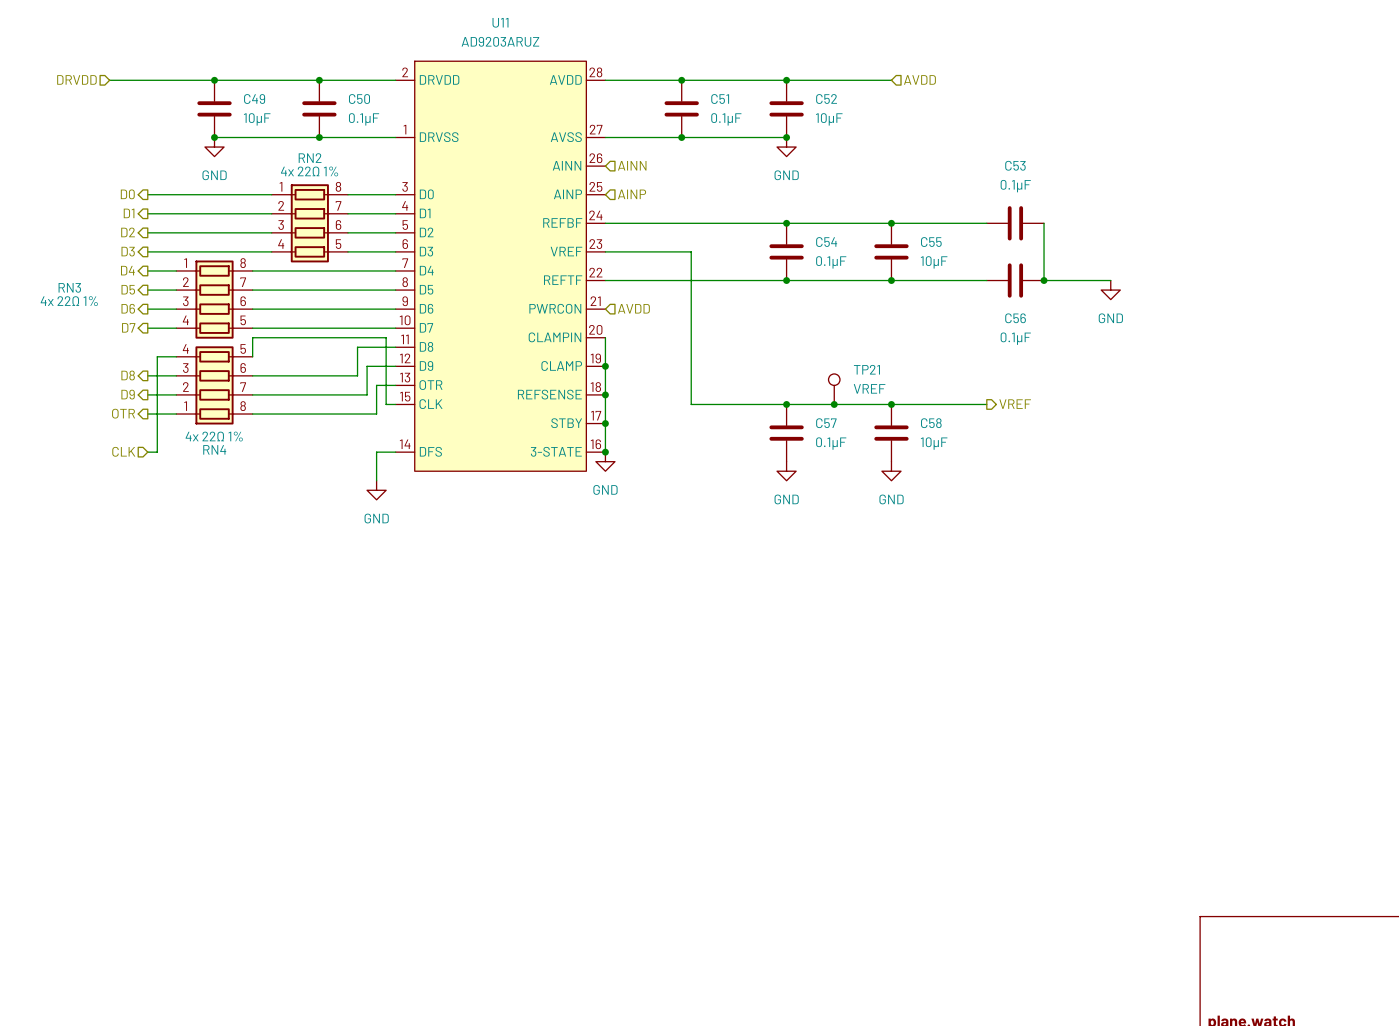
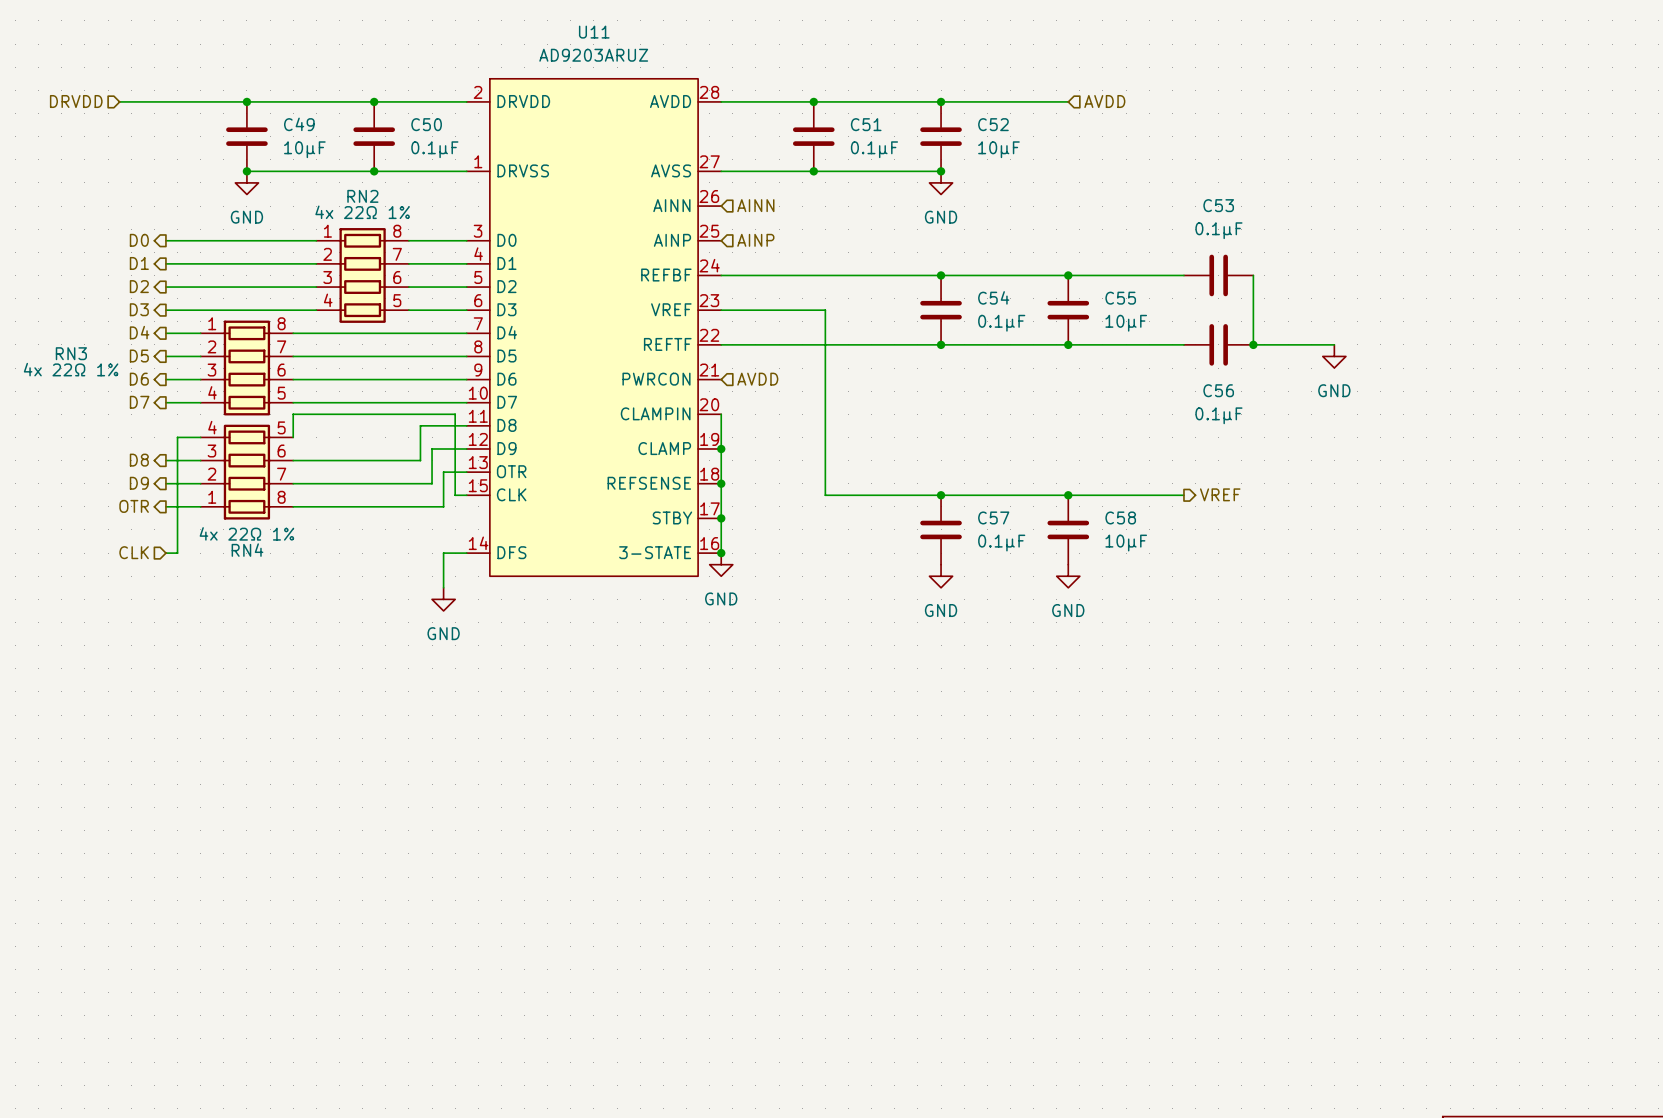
TP21: VREF (834, 389) -> none
junction: (834, 404) -> none

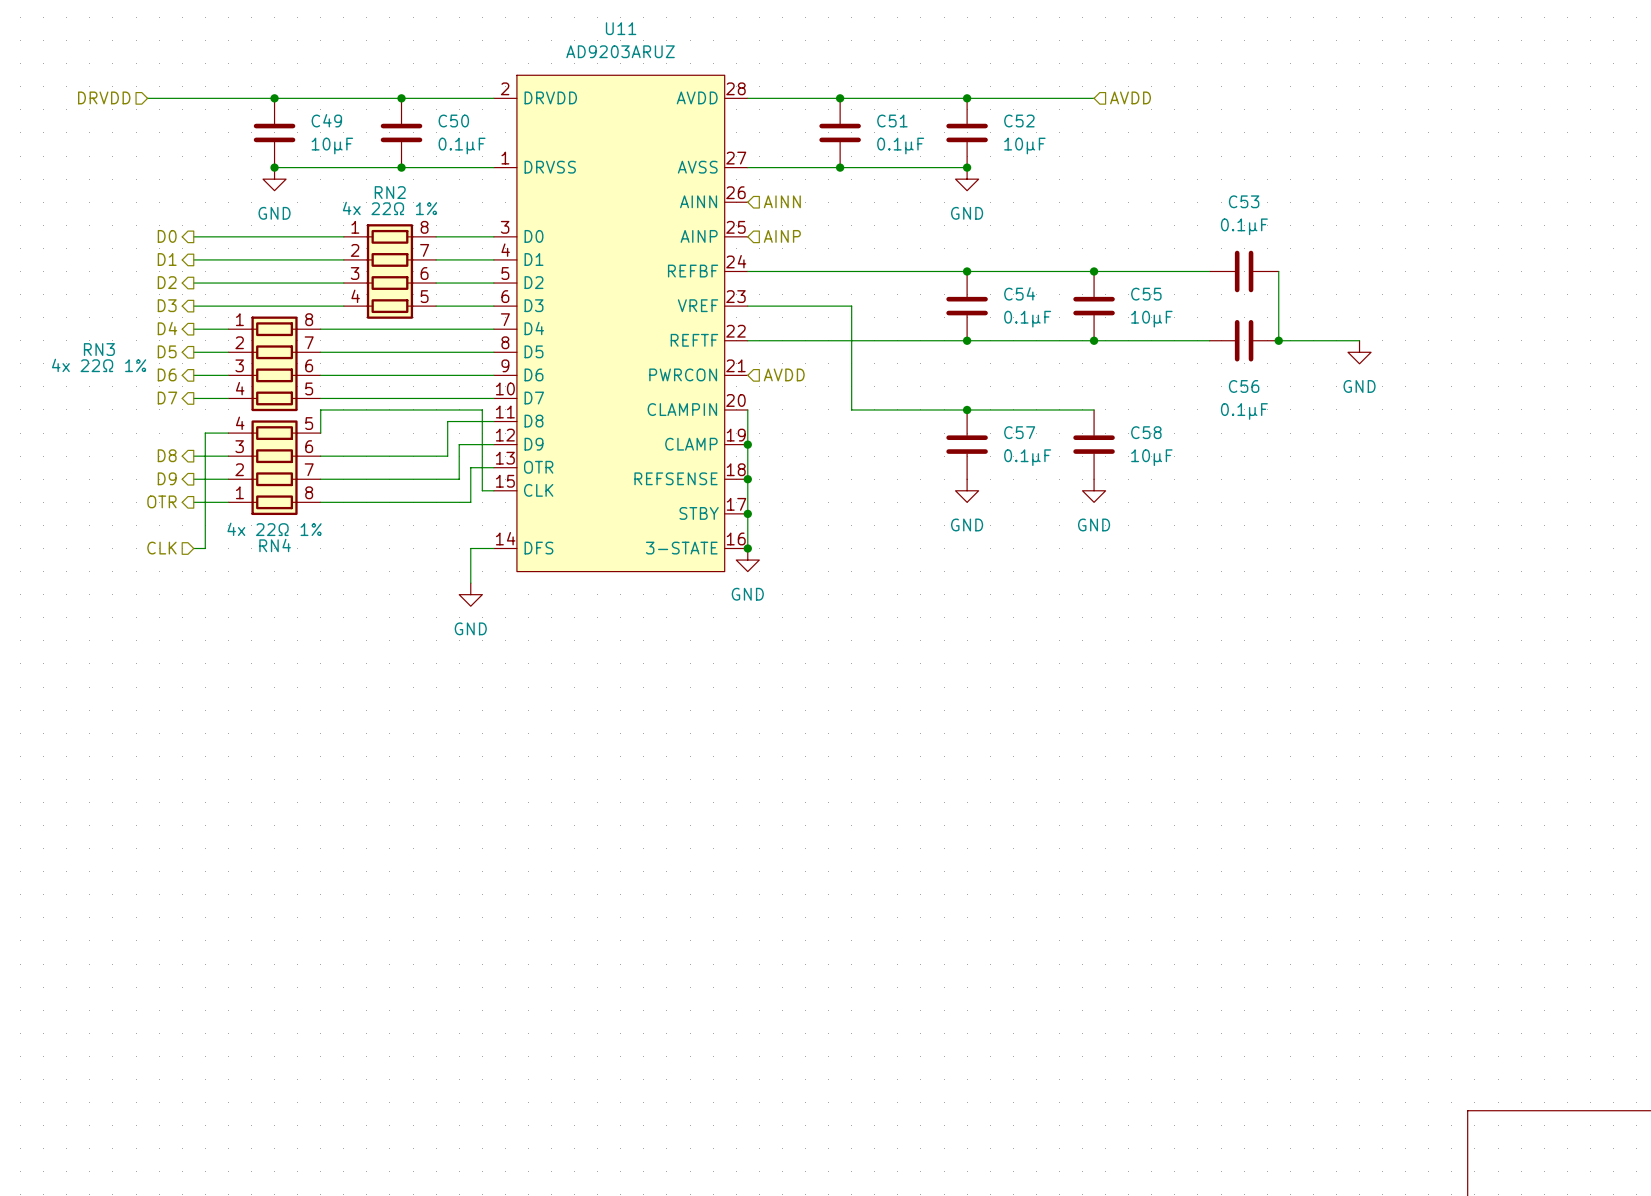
wire: (825, 414) (825, 495) (1183, 495) -> (851, 409) (1094, 409)
junction: none -> (967, 409)
hierarchical label: VREF (1220, 494) -> none
junction: (941, 495) -> none
power symbol: none -> GND (967, 490)
junction: (1068, 495) -> none
power symbol: none -> GND (1094, 490)
C57 position: (941, 529) -> (967, 444)
C58 position: (1068, 529) -> (1094, 444)
power symbol: GND (941, 576) -> none
power symbol: GND (1068, 576) -> none

